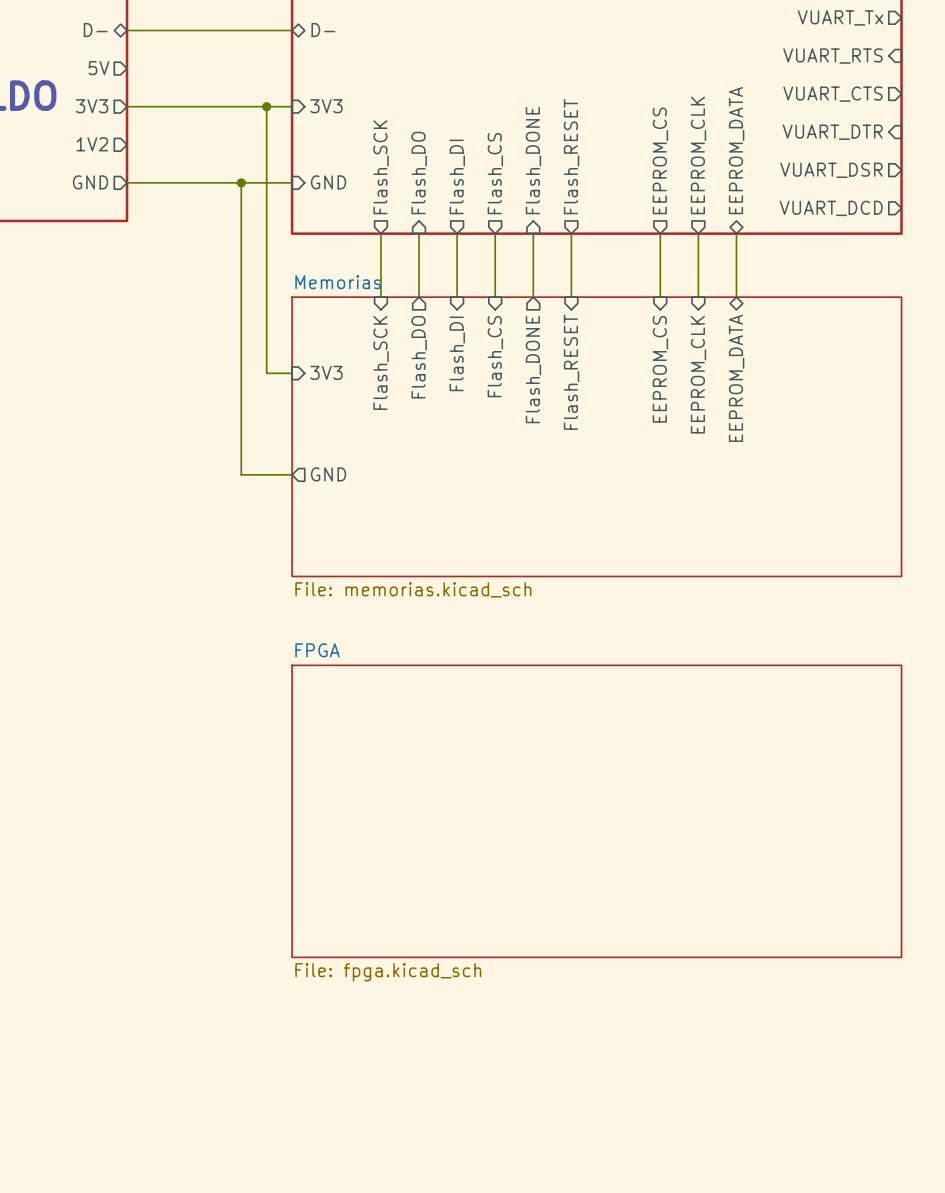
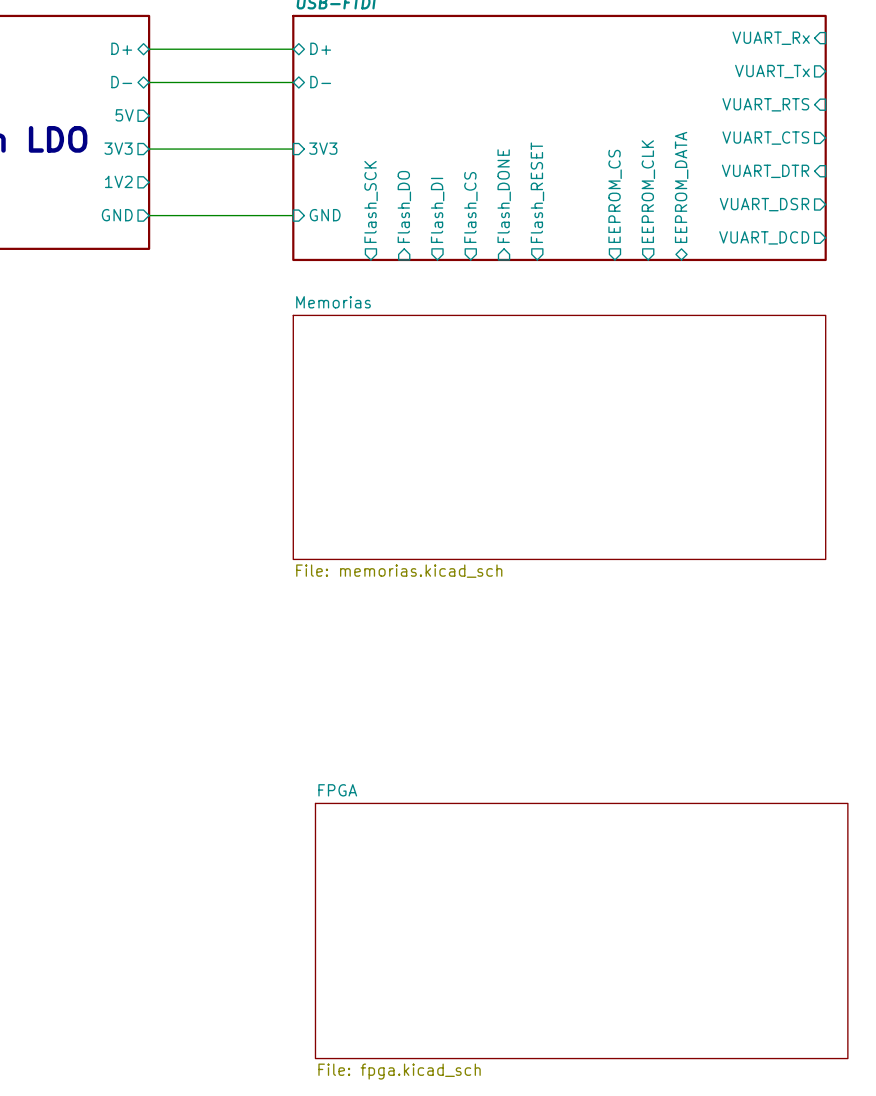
wire: (266, 106) (266, 373) (292, 373) -> none
junction: (266, 106) -> none
wire: (241, 182) (241, 474) (292, 474) -> none
junction: (241, 182) -> none
wire: (380, 233) (380, 297) -> none
wire: (419, 233) (419, 297) -> none
wire: (457, 233) (457, 297) -> none
wire: (495, 233) (495, 297) -> none
wire: (533, 233) (533, 297) -> none
wire: (571, 233) (571, 297) -> none
wire: (660, 233) (660, 297) -> none
wire: (698, 233) (698, 297) -> none
wire: (736, 233) (736, 297) -> none
sheet pin: Flash_DI (457, 353) -> none
sheet pin: Flash_CS (495, 356) -> none
sheet pin: Flash_DO (419, 357) -> none
sheet pin: Flash_SCK (381, 362) -> none
sheet pin: Flash_DONE (533, 369) -> none
sheet pin: EEPROM_CS (660, 369) -> none
sheet pin: 3V3 (326, 372) -> none
sheet pin: Flash_RESET (571, 372) -> none
sheet pin: EEPROM_CLK (698, 374) -> none
sheet pin: EEPROM_DATA (736, 378) -> none
sheet pin: GND (328, 474) -> none
sheet FPGA position: (596, 811) -> (581, 930)

